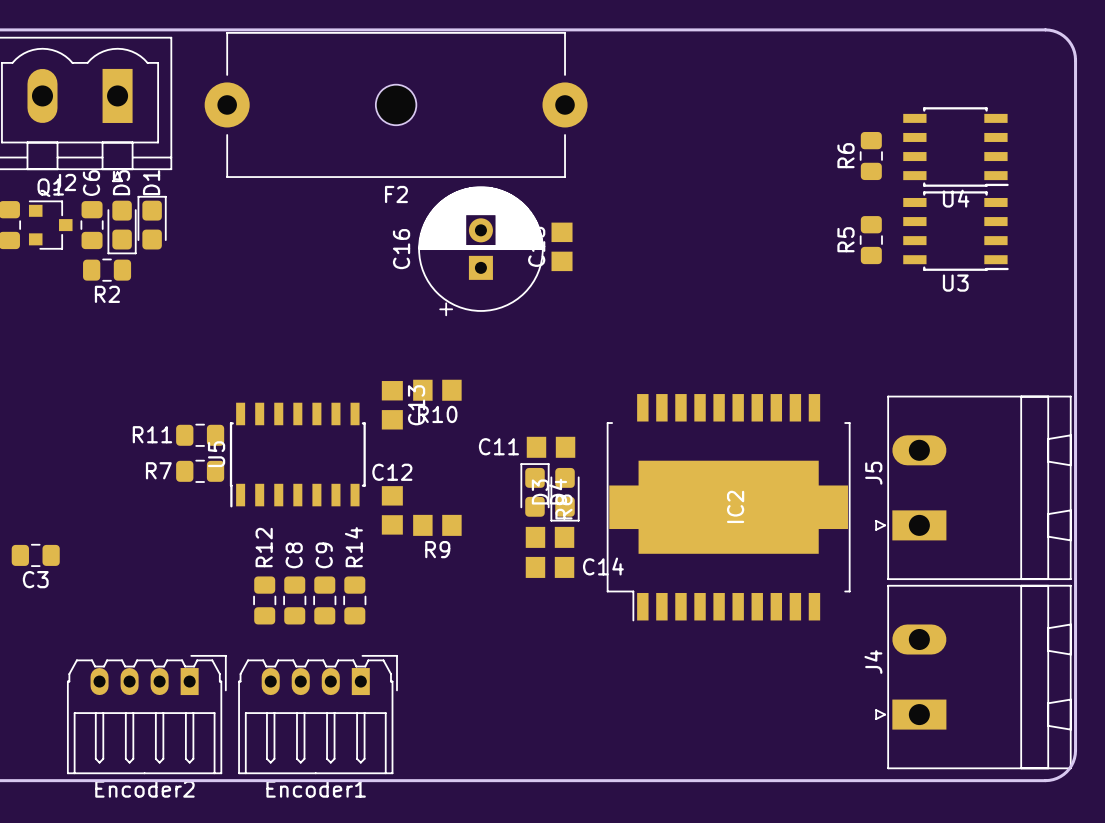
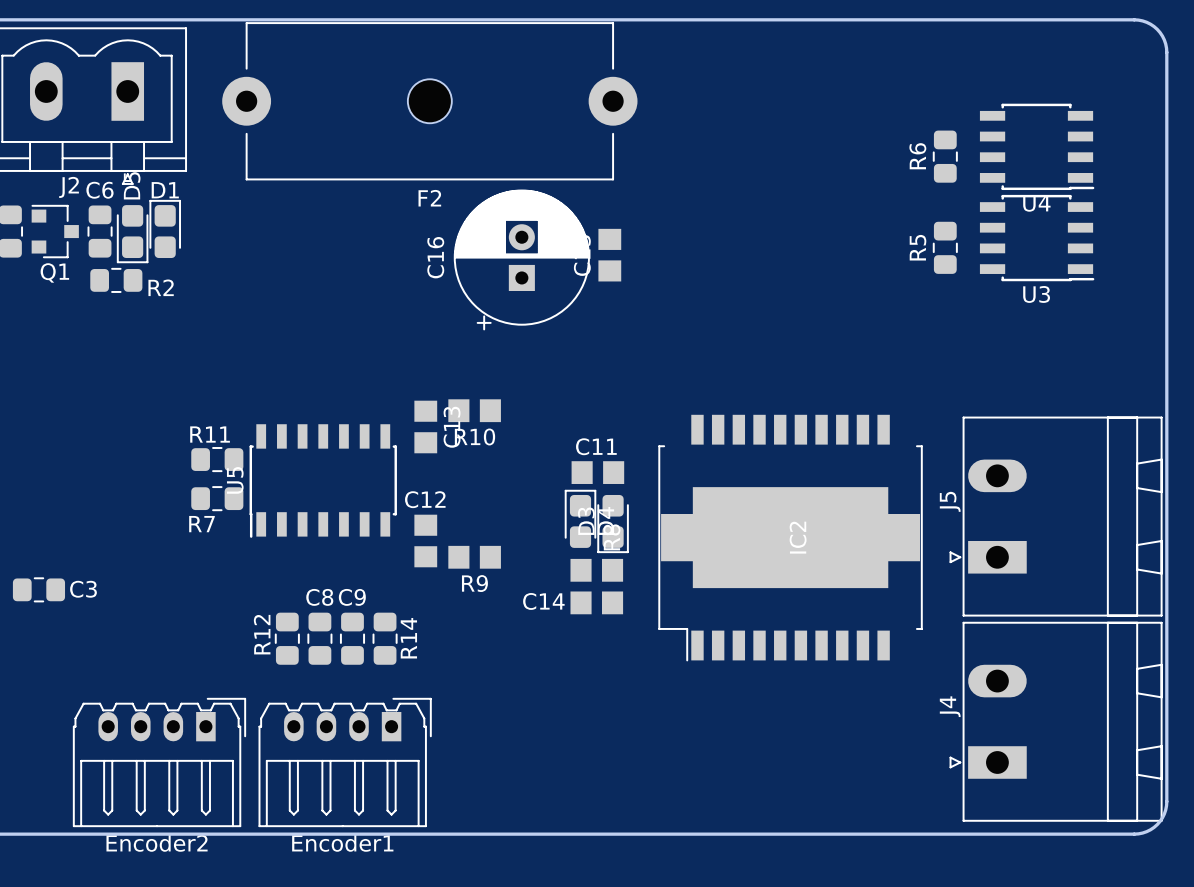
D1 name rotation: 0° (151, 182) -> 90° clockwise (165, 190)
C6 name rotation: 0° (91, 183) -> 90° clockwise (99, 190)
Q1 name position: Q1 (50, 187) -> Q1 (54, 272)
R2 name position: R2 (107, 294) -> R2 (161, 287)
R11 name position: R11 (152, 434) -> R11 (210, 434)
C11 name position: C11 (498, 446) -> C11 (596, 446)
R7 name position: R7 (158, 470) -> R7 (201, 524)
R12 name position: R12 (264, 547) -> R12 (262, 634)
R14 name position: R14 (353, 547) -> R14 (408, 638)
C8 name rotation: 0° (294, 555) -> 90° clockwise (319, 597)
C9 name rotation: 0° (324, 555) -> 90° clockwise (352, 597)
C14 name position: C14 (603, 566) -> C14 (543, 601)
C3 name position: C3 (35, 579) -> C3 (83, 589)

